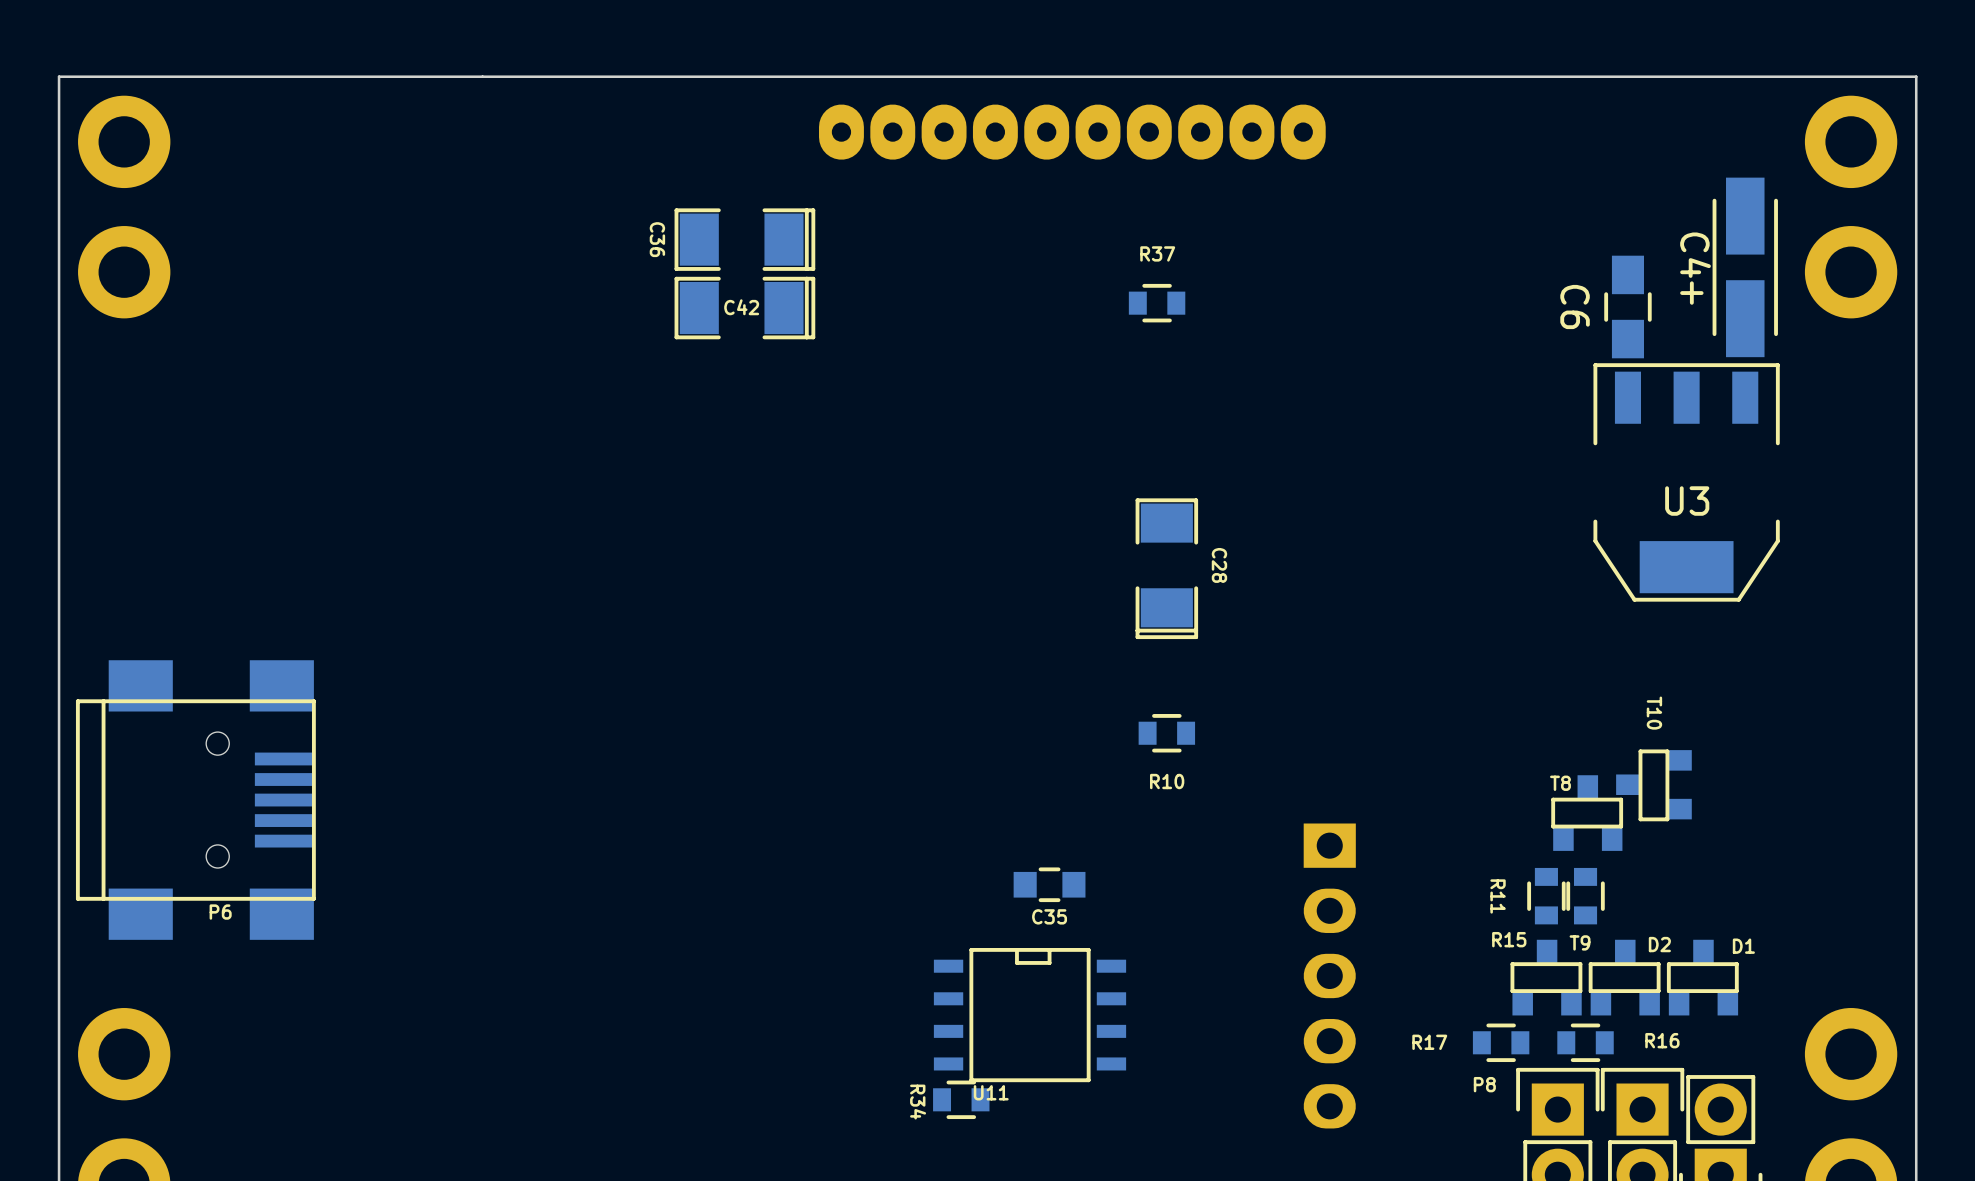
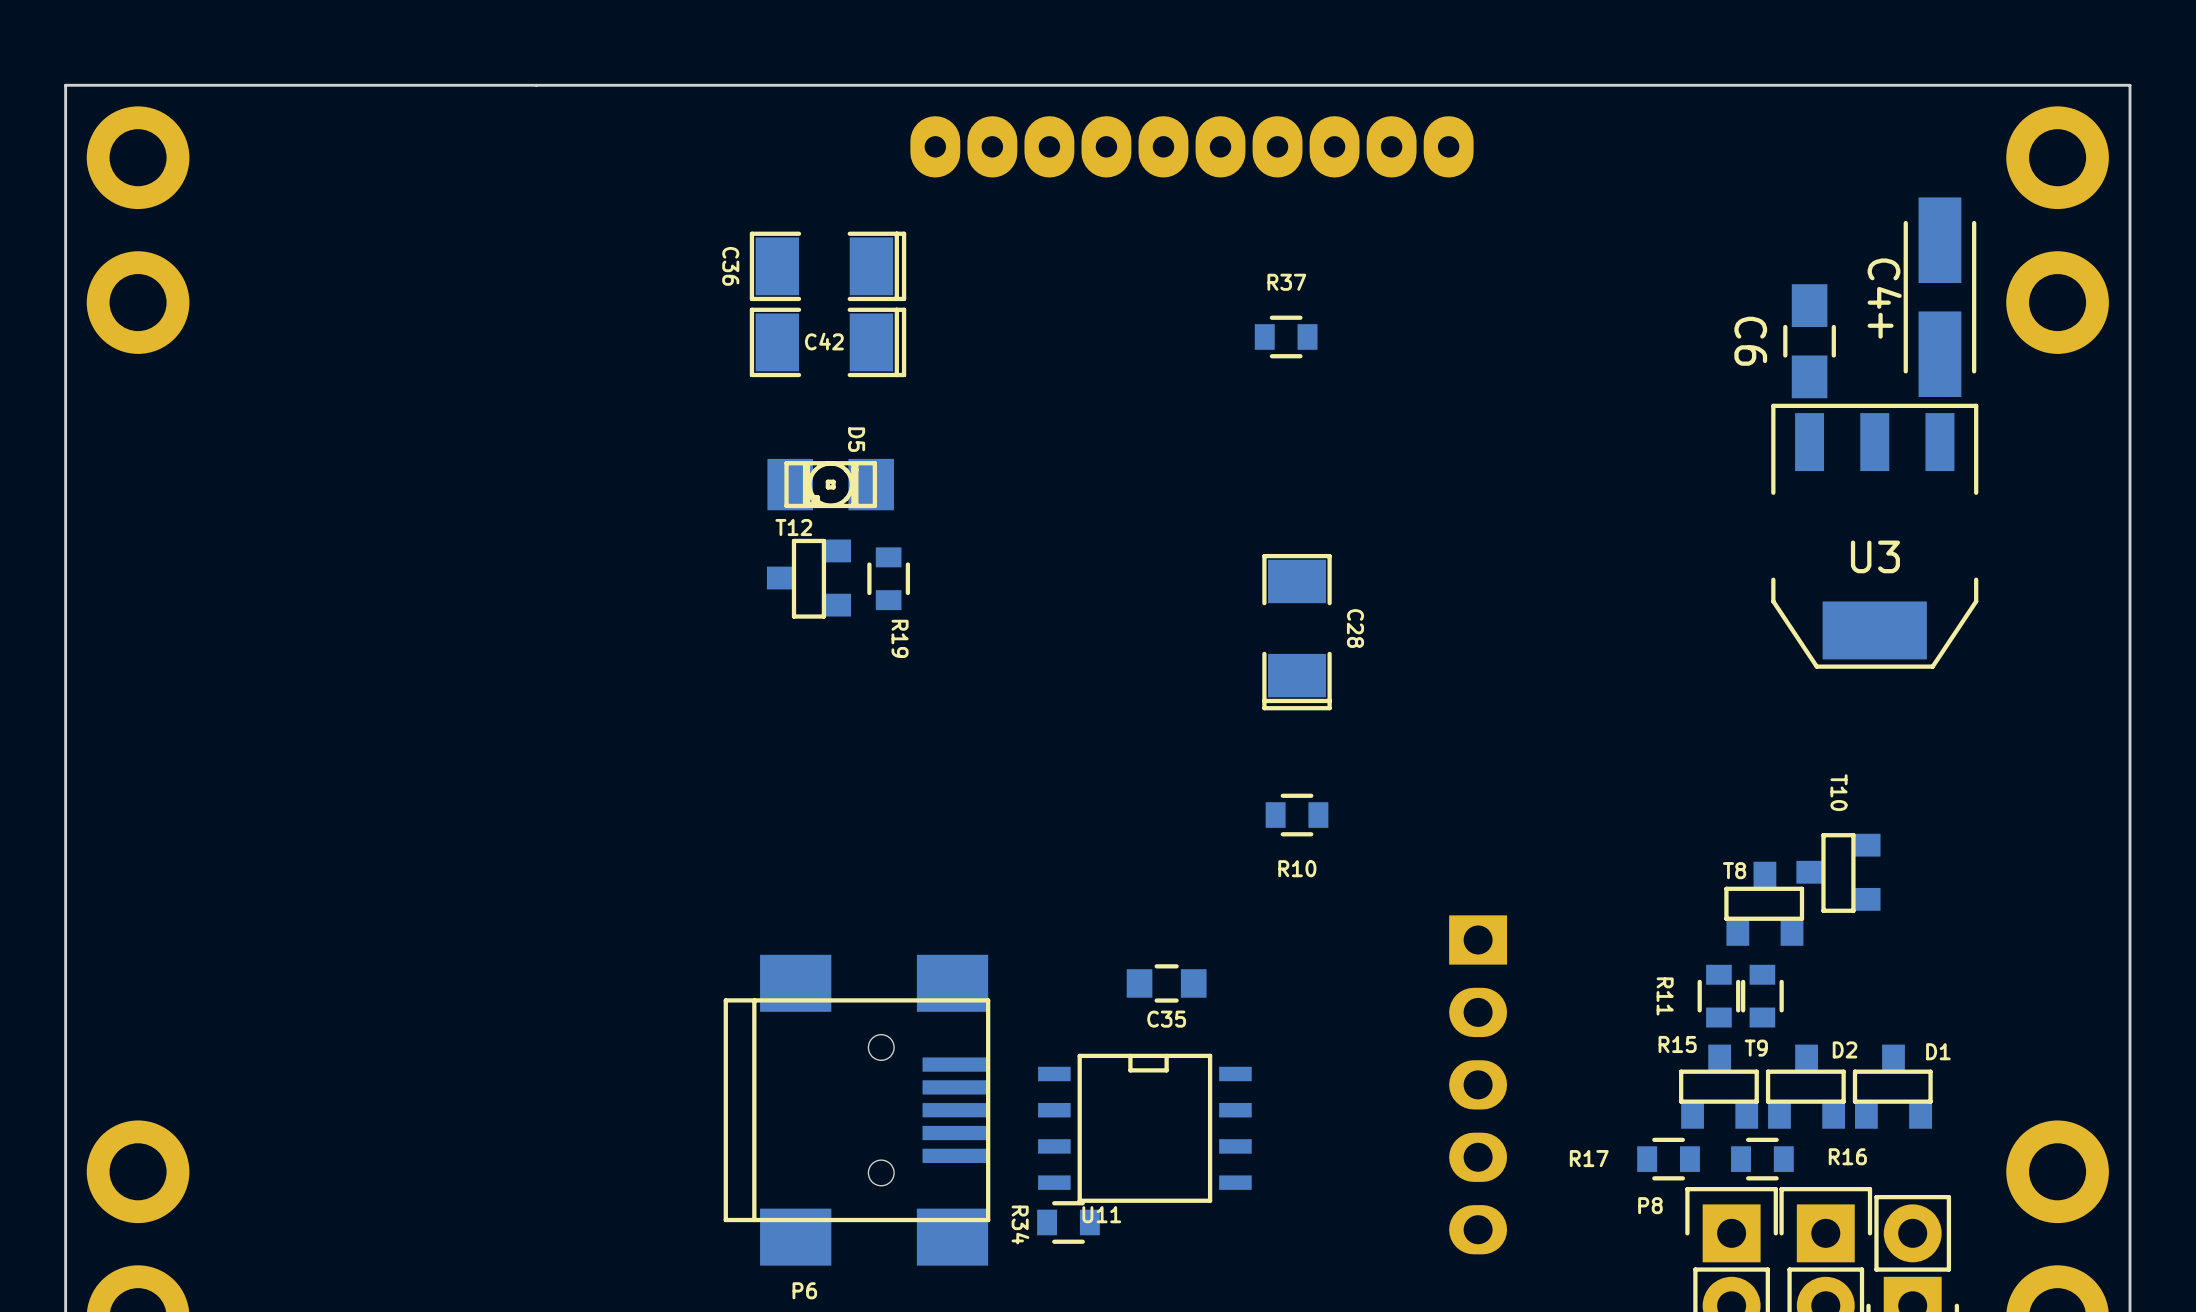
D5: none -> (830, 484)
T12: none -> (808, 578)
R19: none -> (888, 578)
P6 position: (195, 800) -> (856, 1110)
P6 name position: P6 (220, 912) -> P6 (804, 1290)

